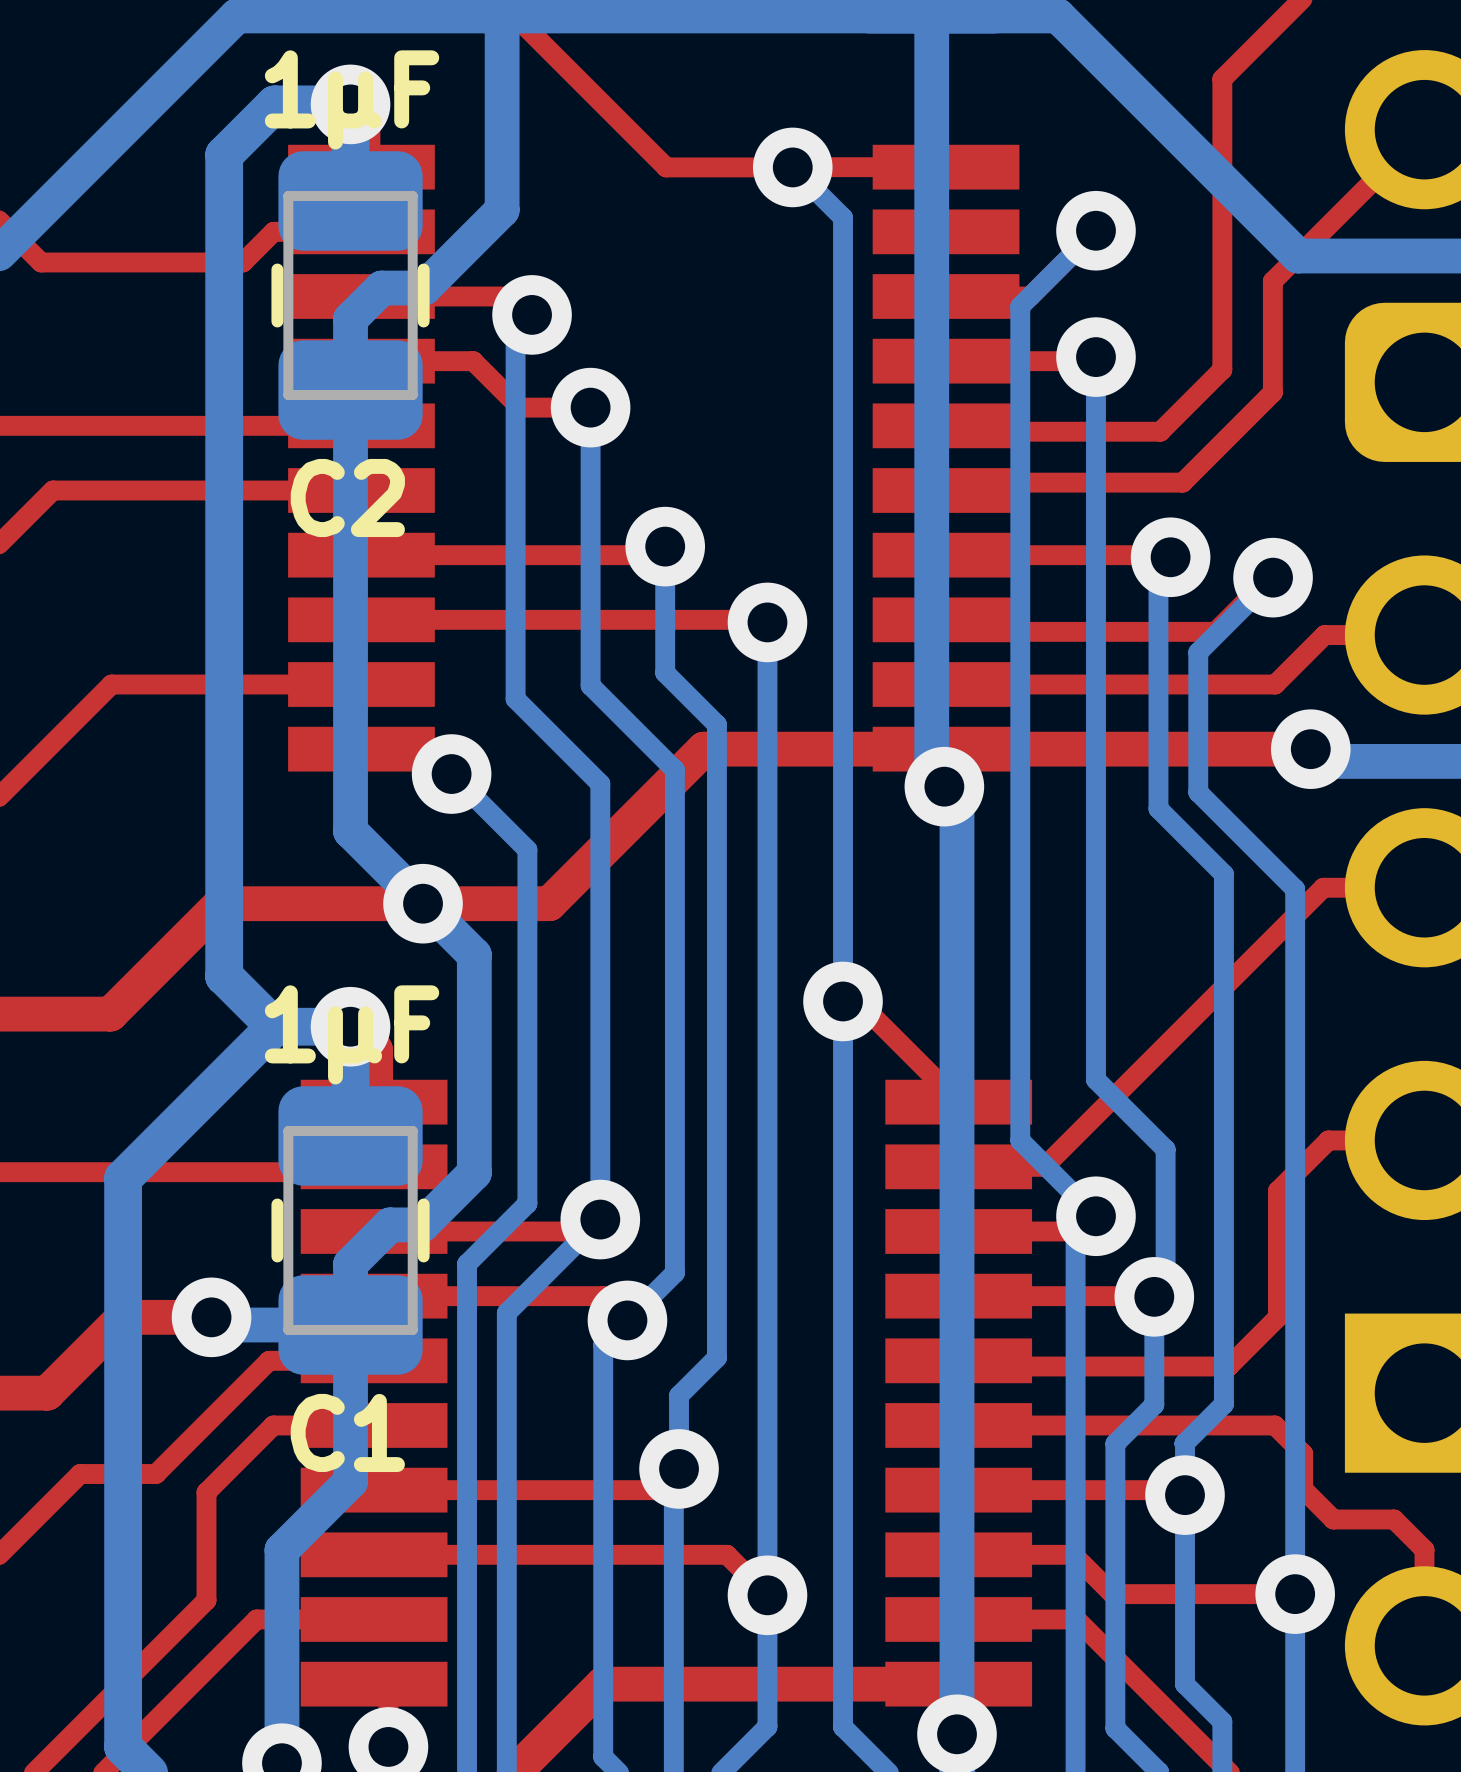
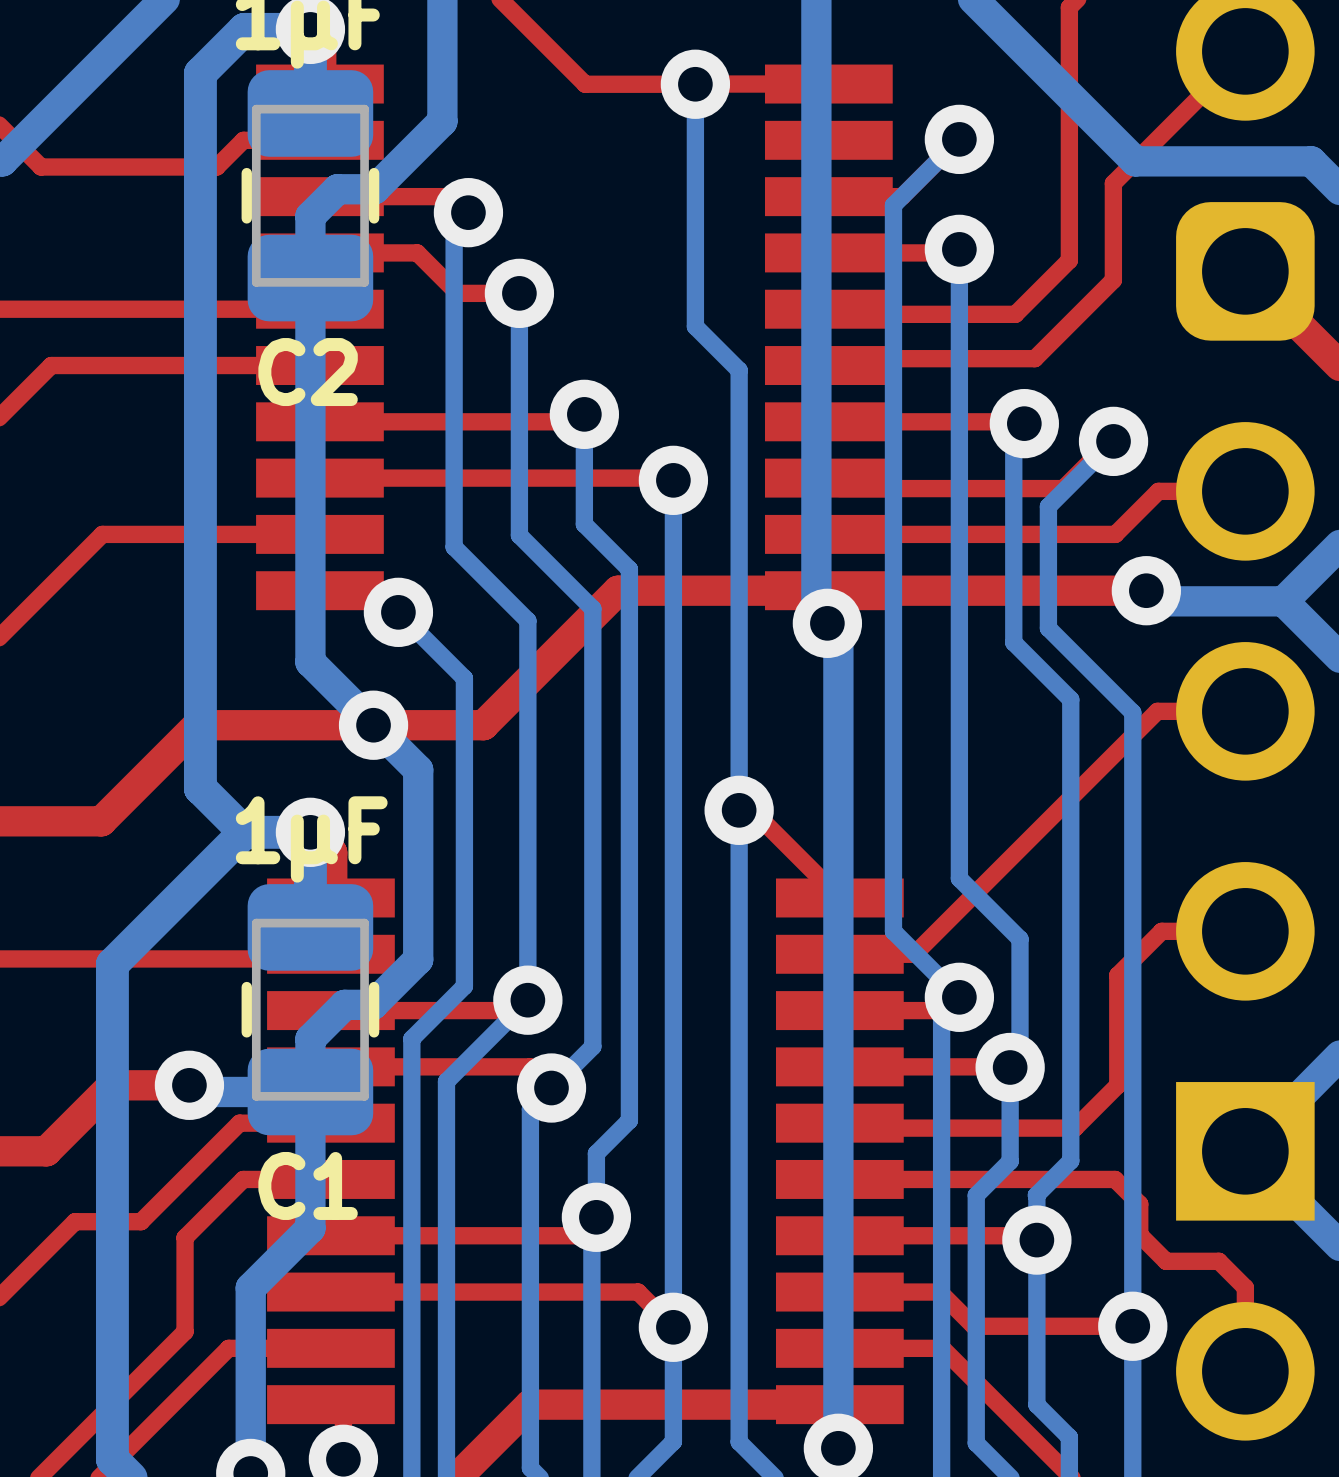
bottom track: (792, 167) (843, 217) (843, 496) -> (695, 84) (695, 326) (739, 370)

